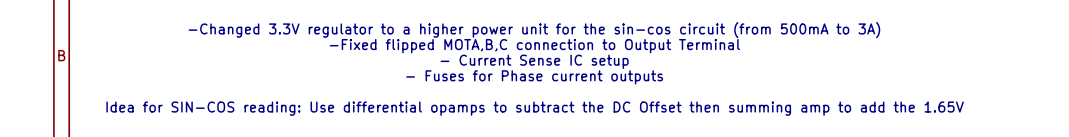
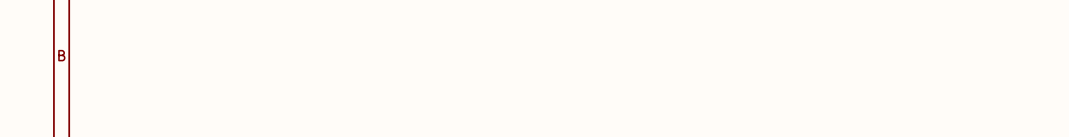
text: -Changed 3.3V regulator to a higher power unit for the sin-cos circuit (from 500mA to 3A) (534, 30) -> none
text: -Fixed flipped MOTA,B,C connection to Output Terminal (534, 46) -> none
text: - Current Sense IC setup (534, 61) -> none
text: - Fuses for Phase current outputs (534, 77) -> none
text: Idea for SIN-COS reading: Use differential opamps to subtract the DC Offset then summing amp to add the 1.65V (535, 108) -> none

